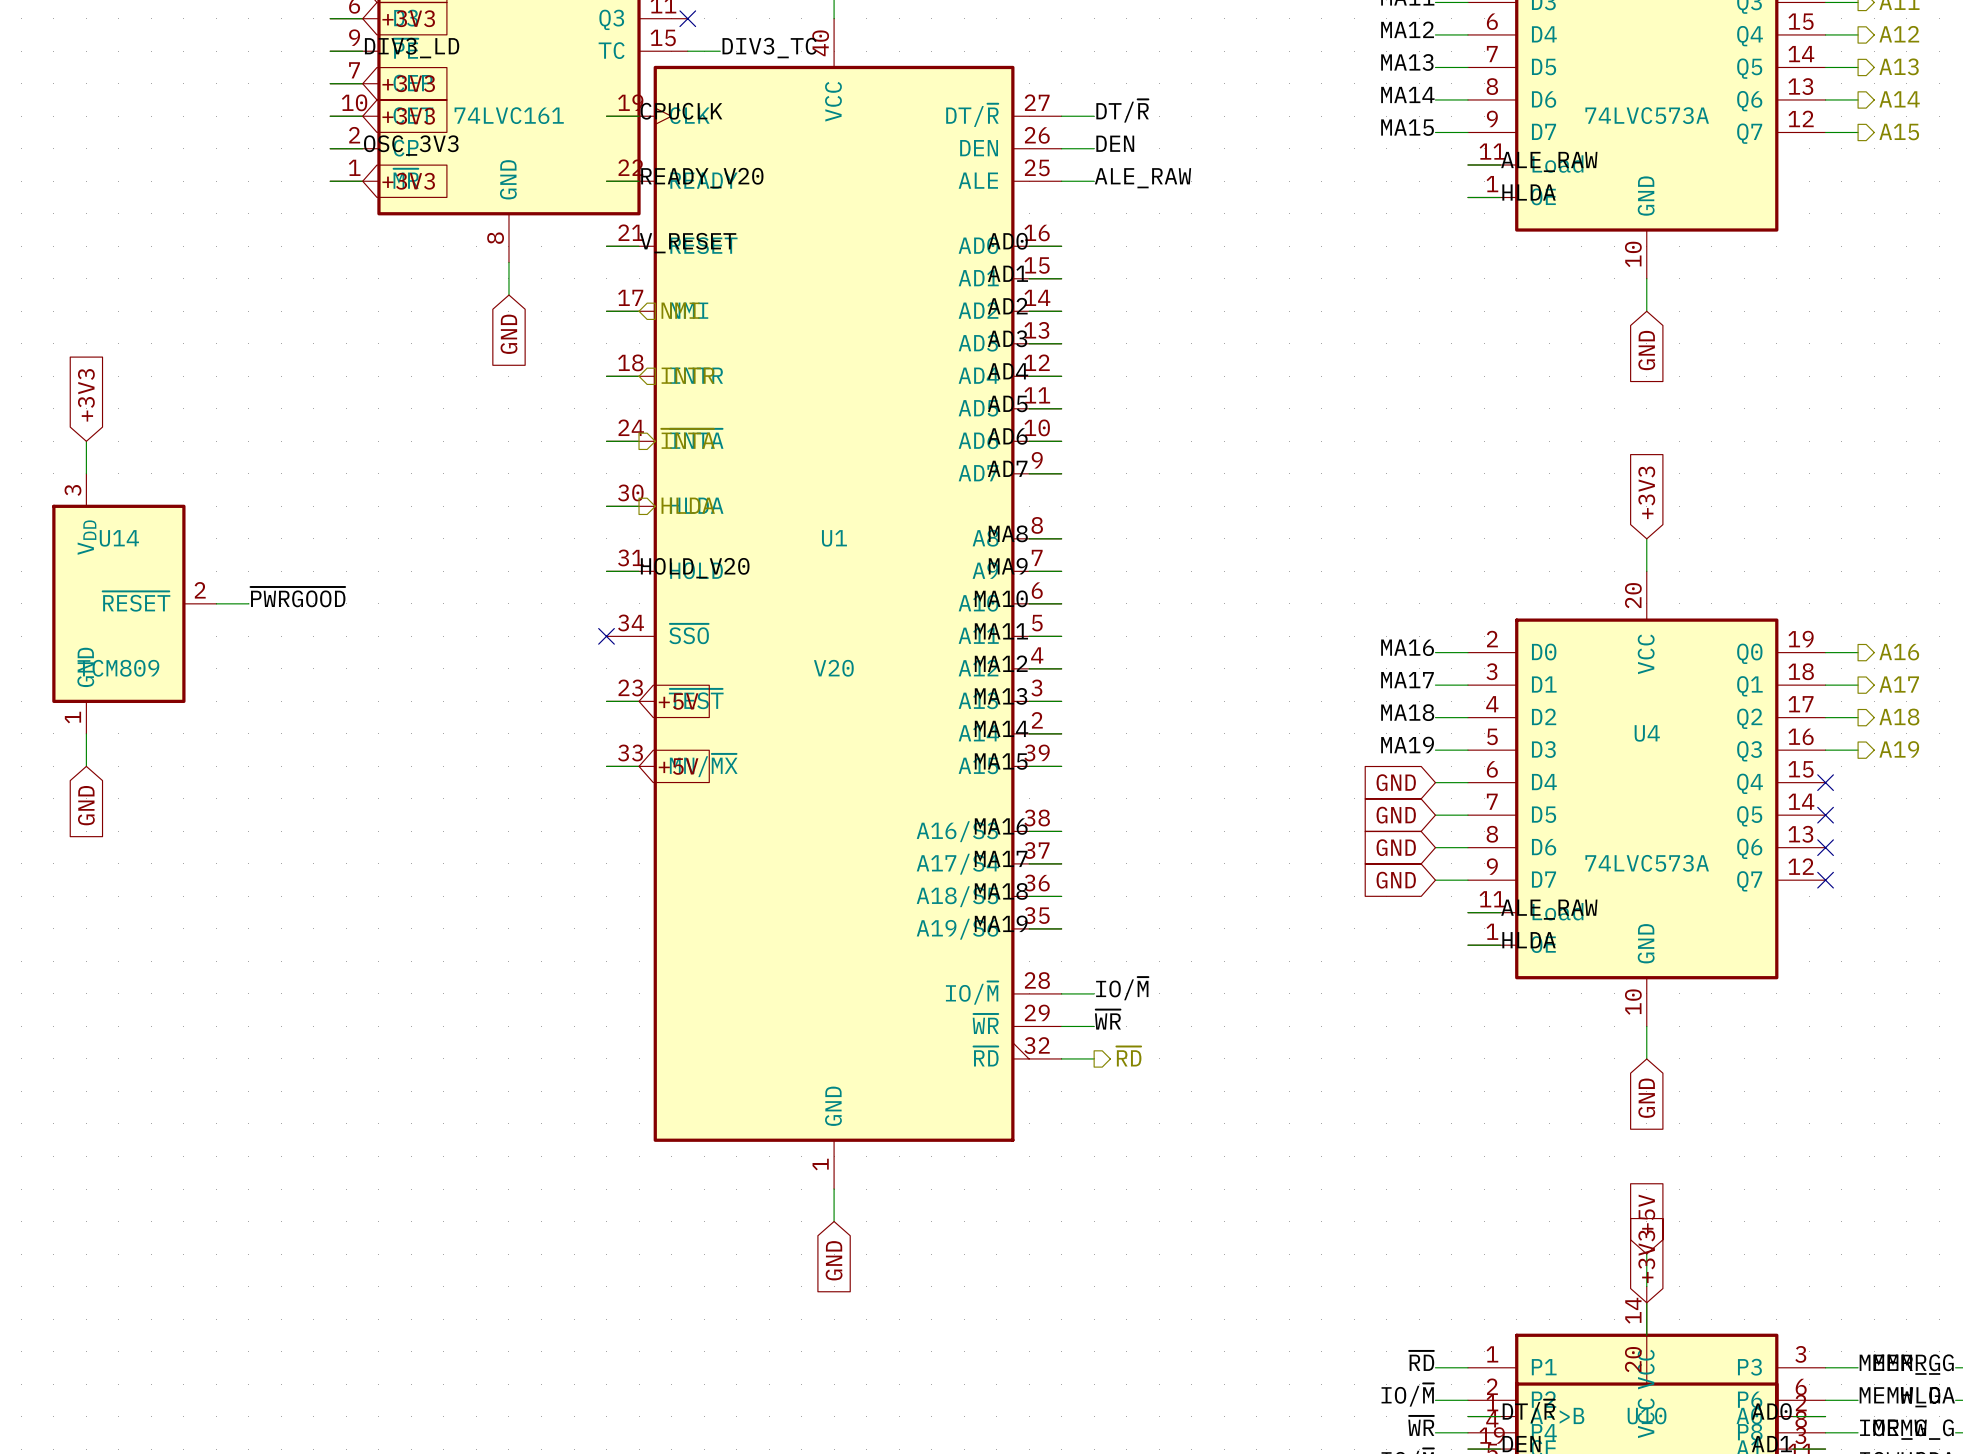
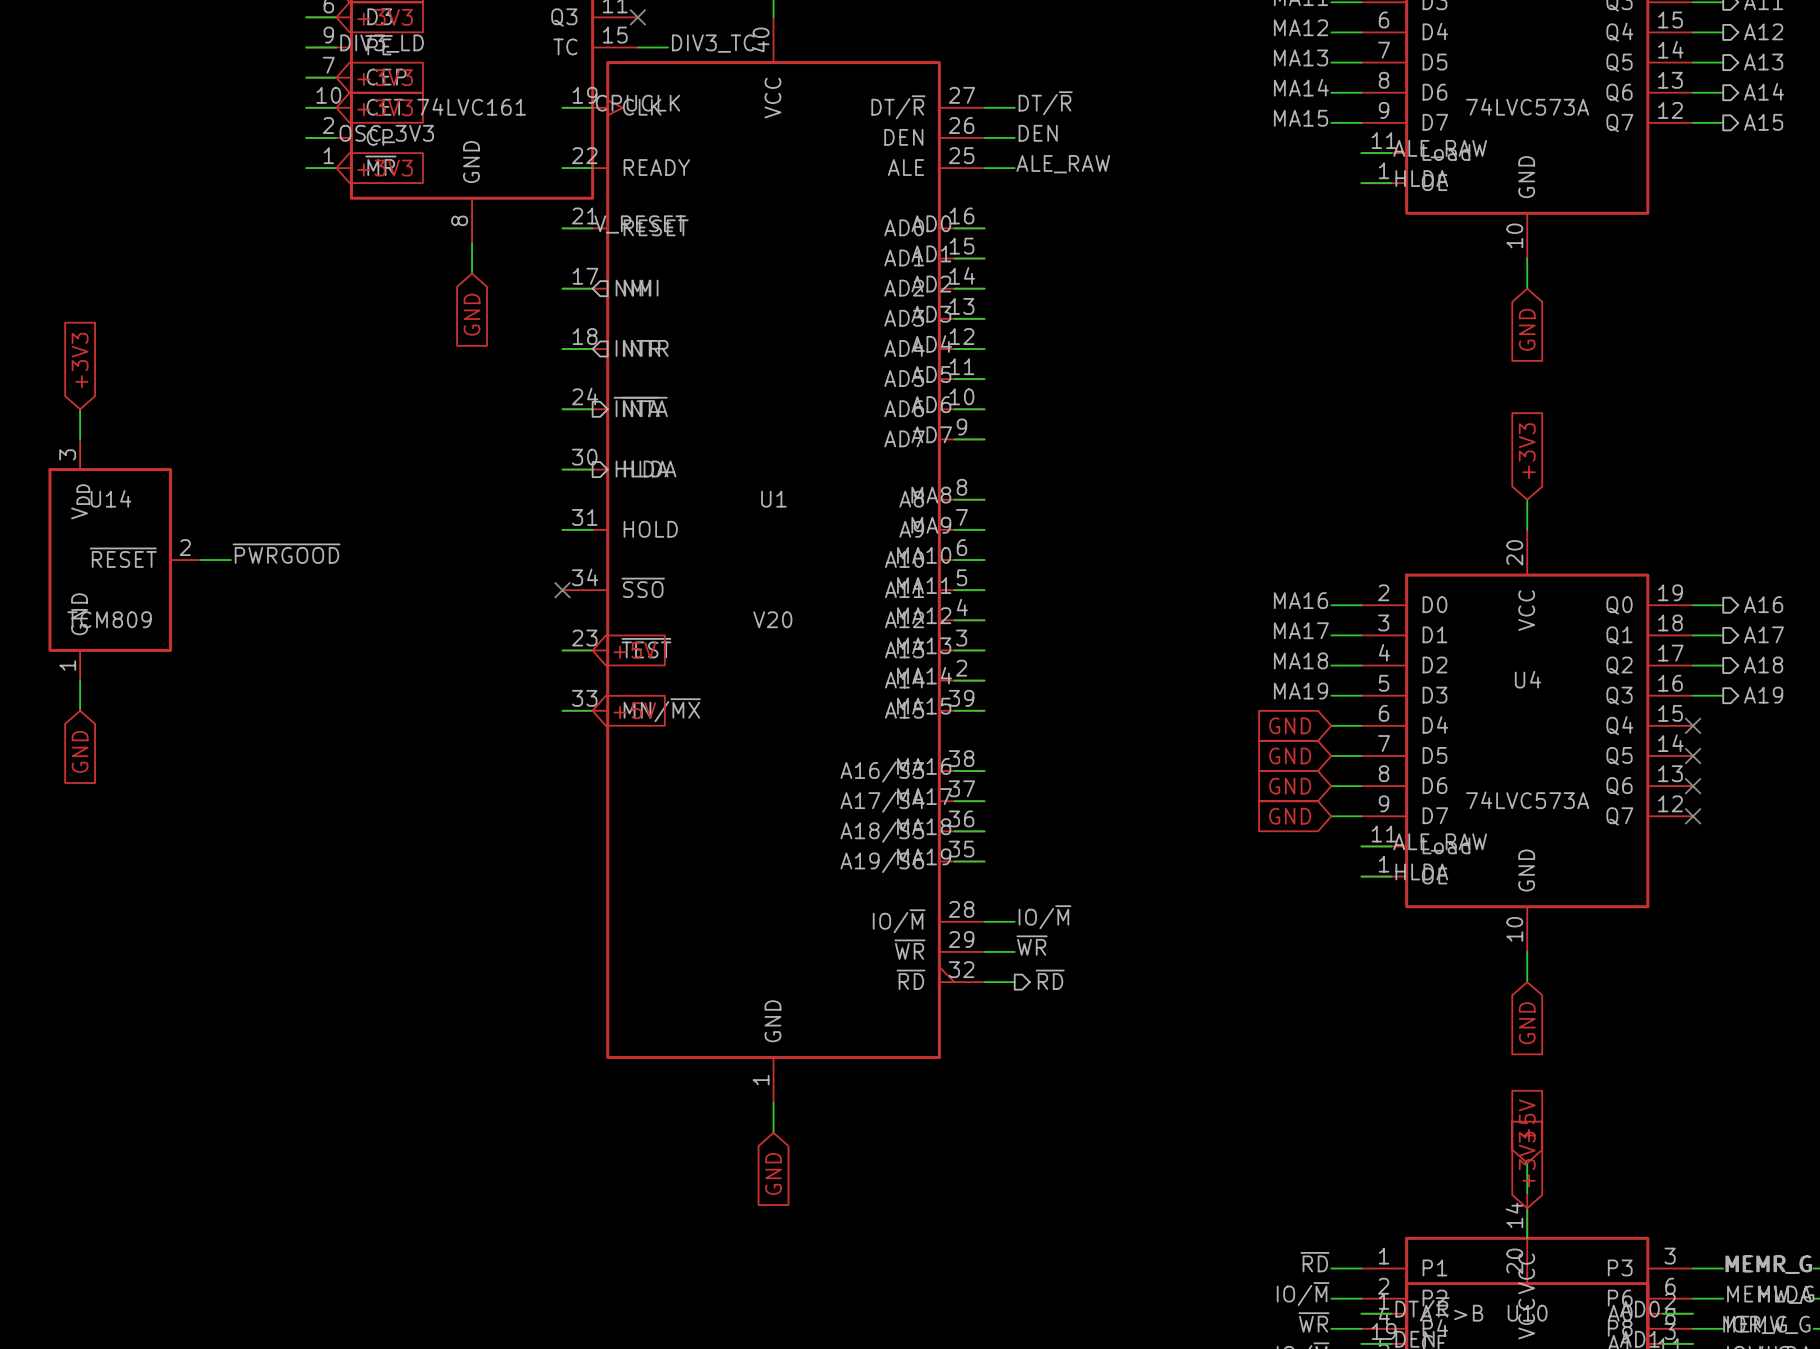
label: READY_V20 (702, 178) -> none
label: HOLD_V20 (695, 568) -> none

